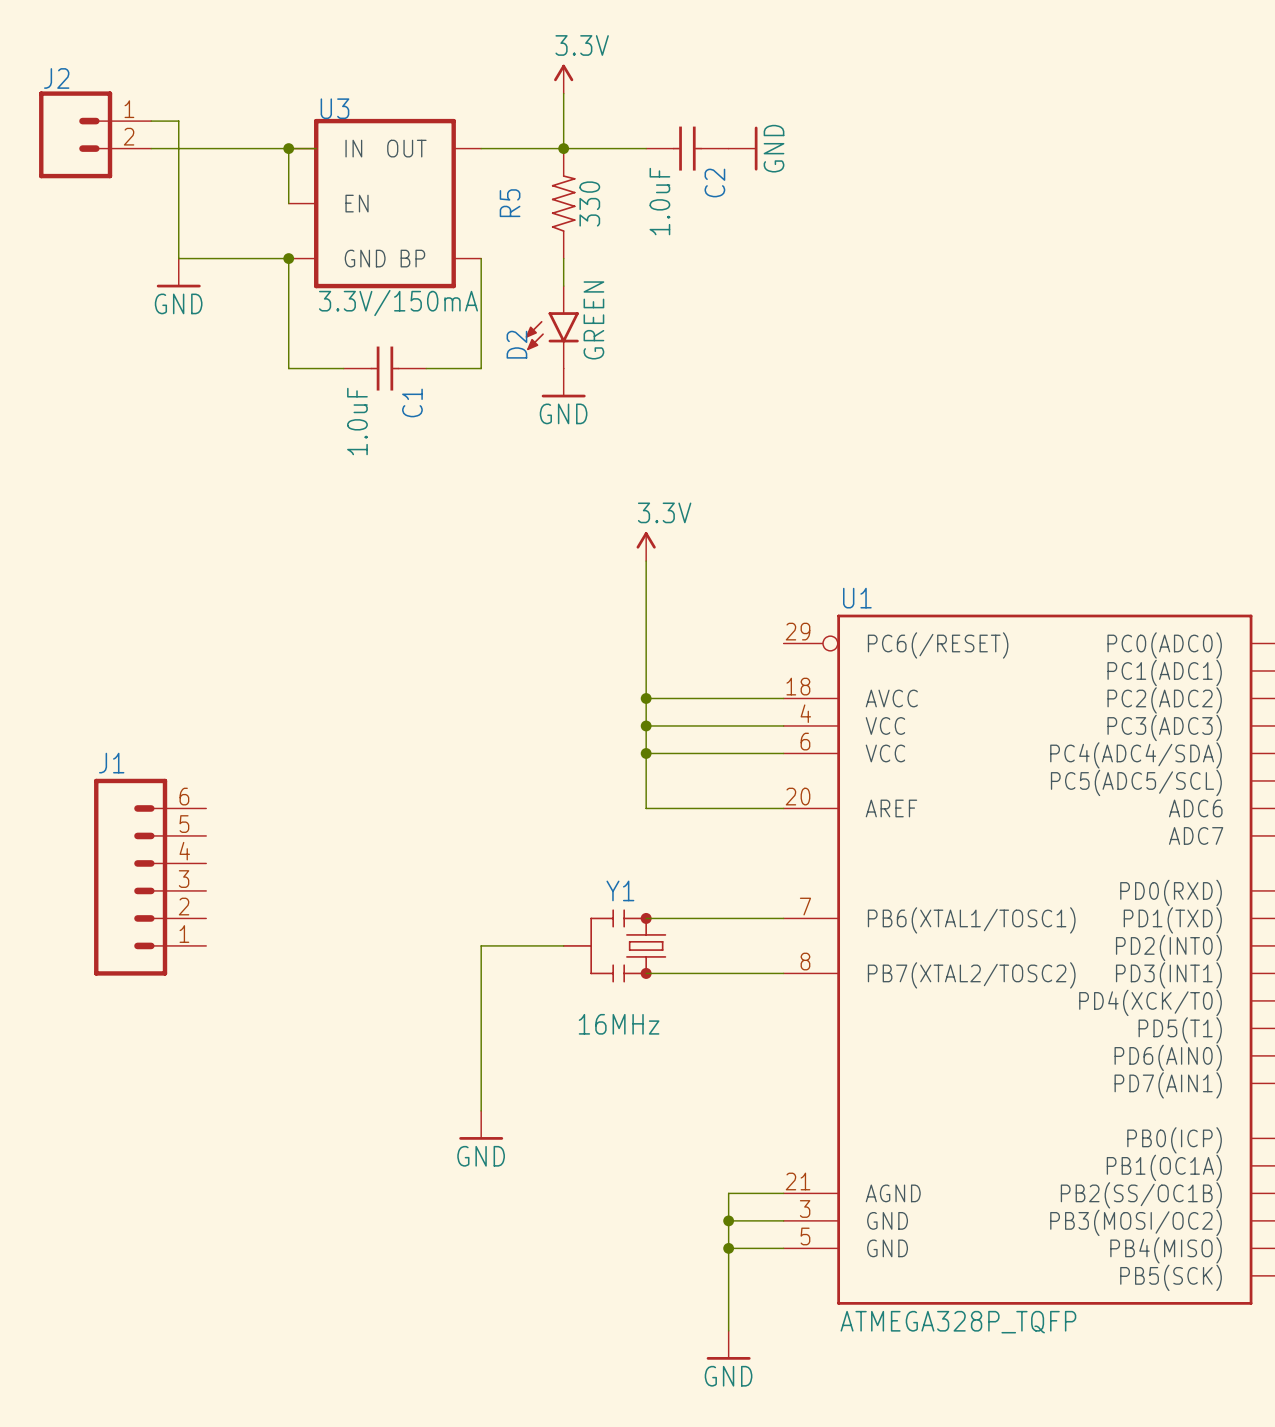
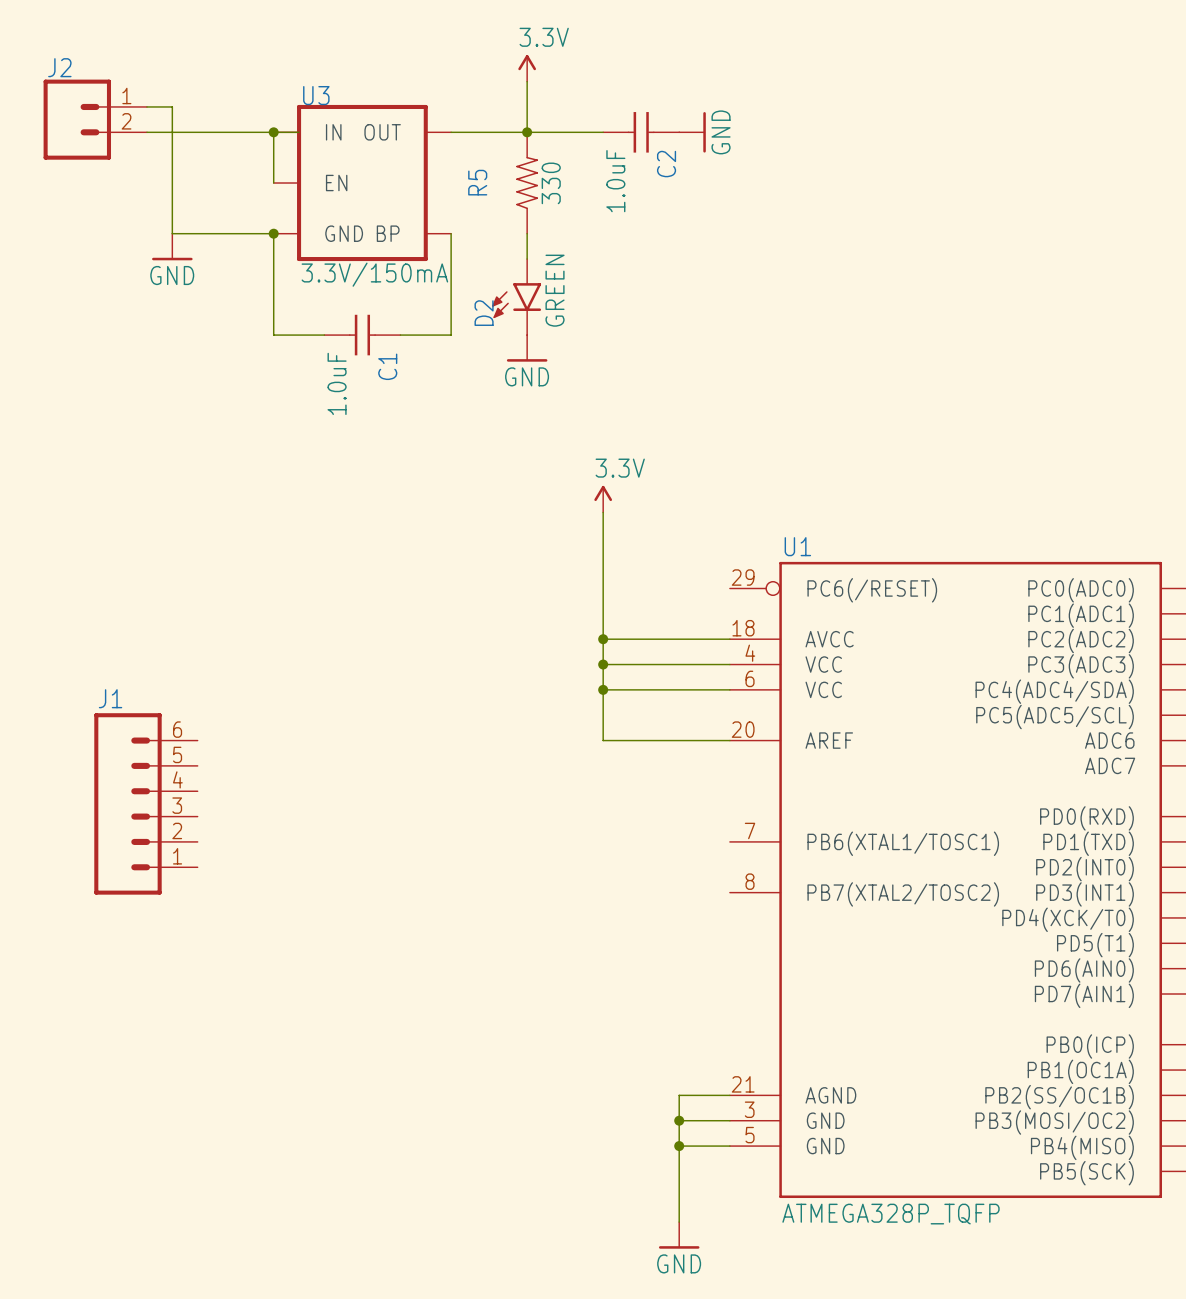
wire: (646, 918) (783, 918) -> none
wire: (563, 945) (481, 945) (481, 1110) -> none
Y1: 16MHz (614, 945) -> none
wire: (646, 973) (783, 973) -> none
power symbol: GND (481, 1125) -> none

